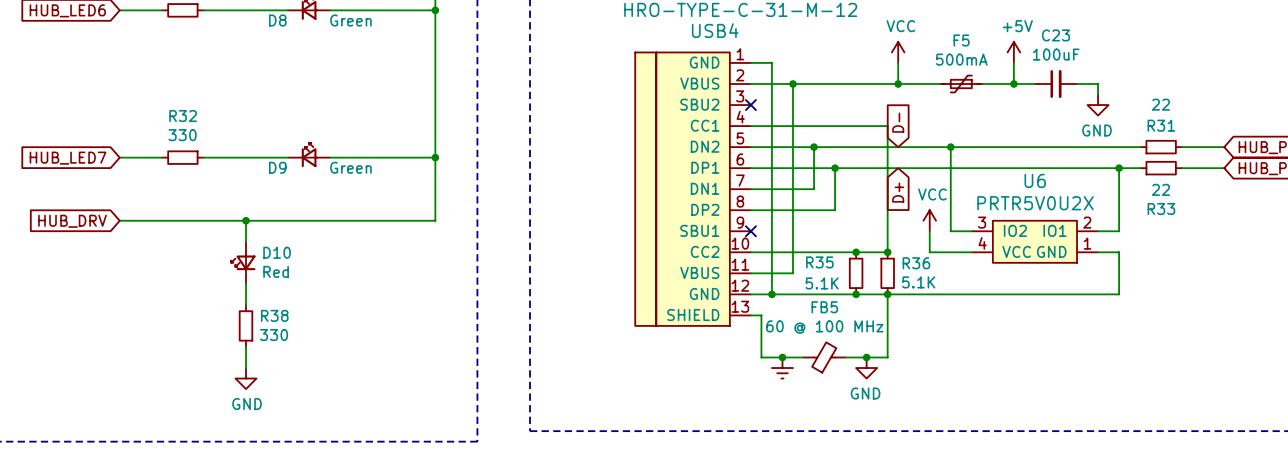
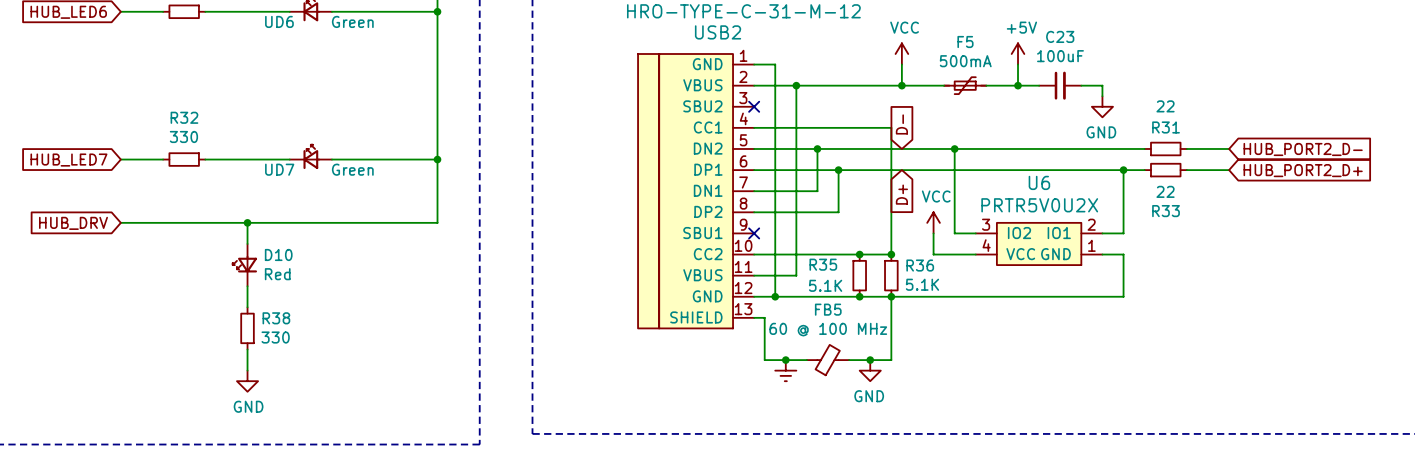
D8 name: D8 (277, 20) -> UD6 (279, 21)
USB4 name: USB4 (715, 30) -> USB2 (718, 32)
D9 name: D9 (277, 167) -> UD7 (279, 169)

